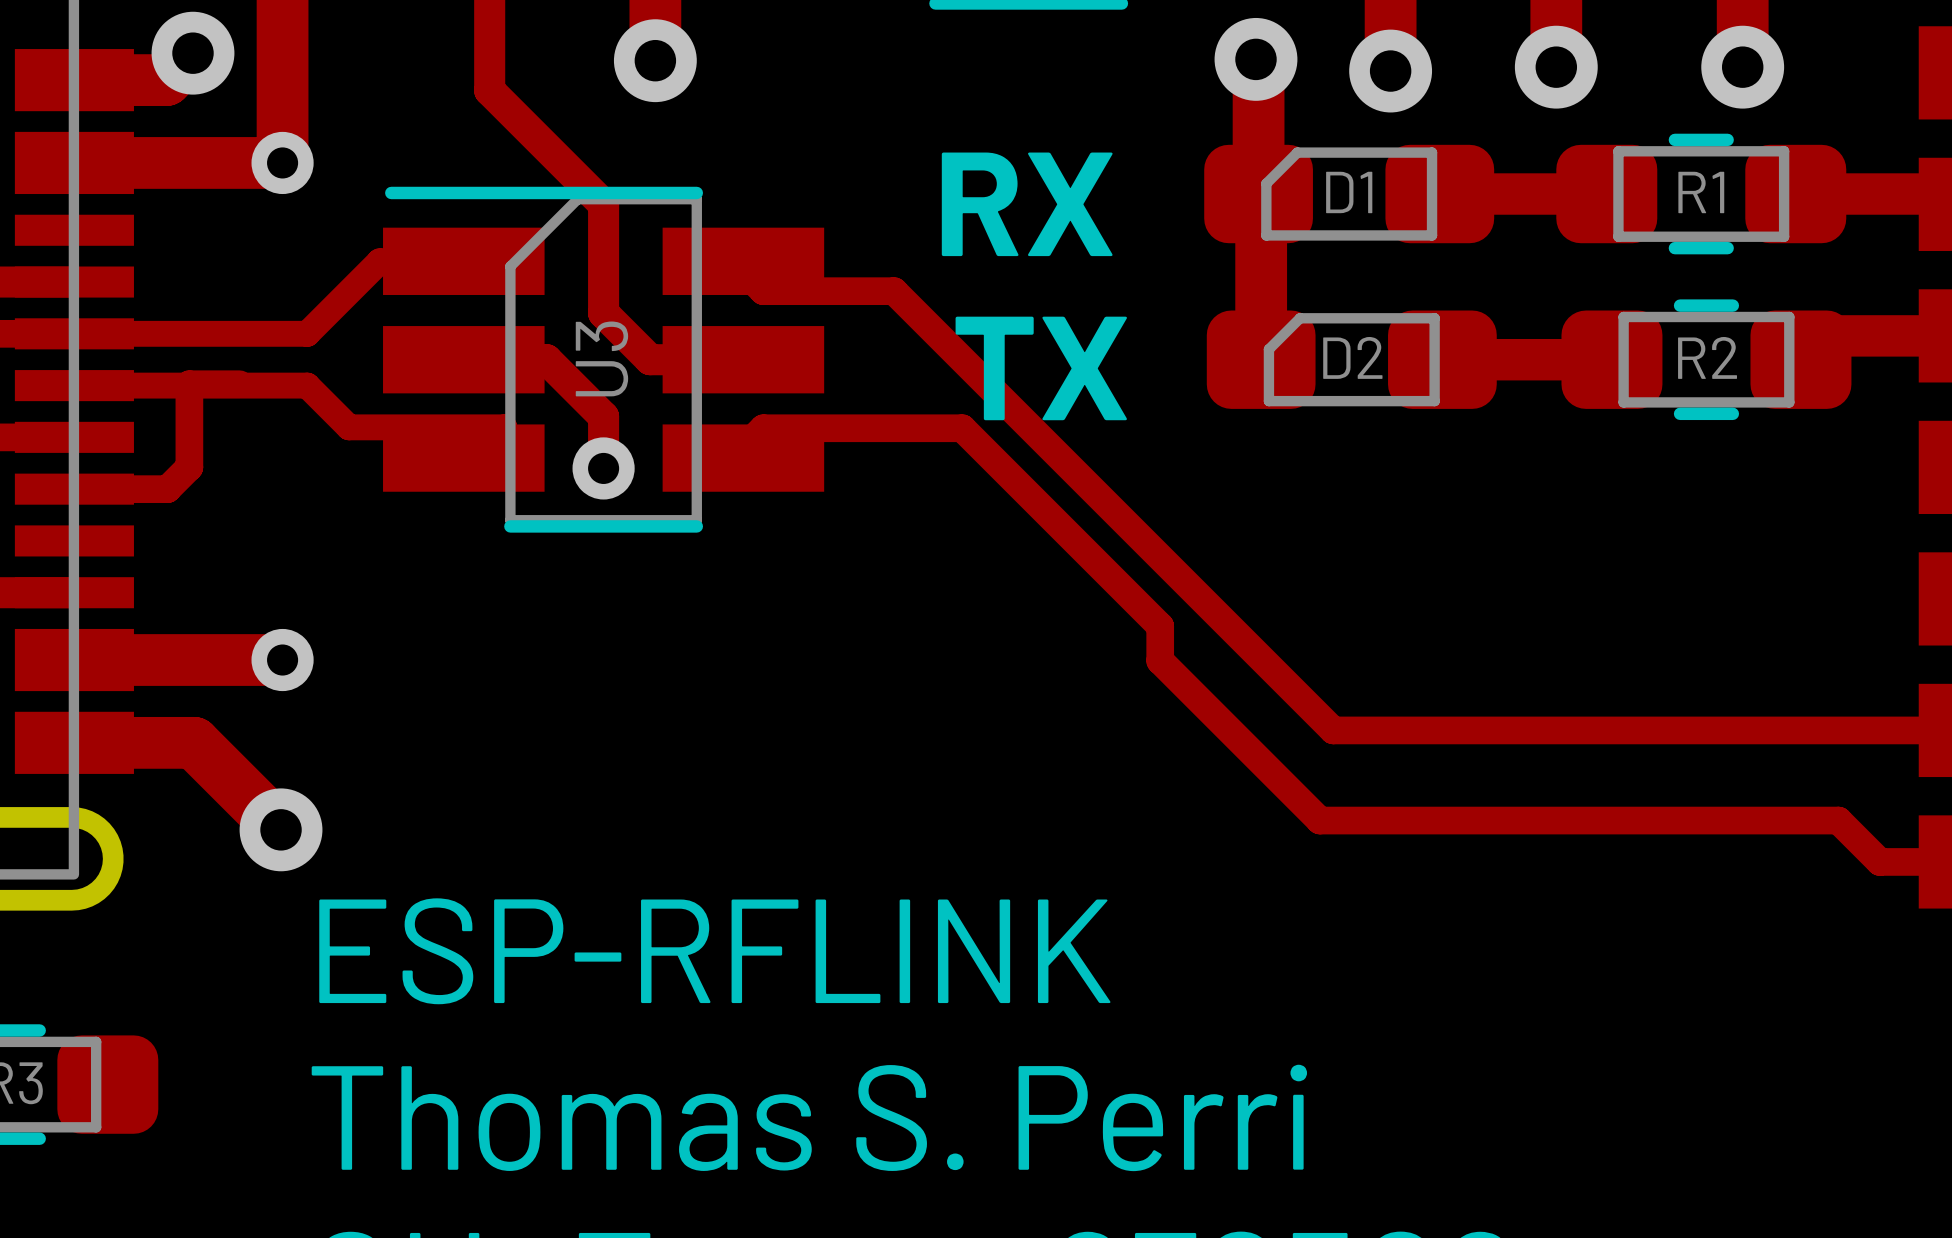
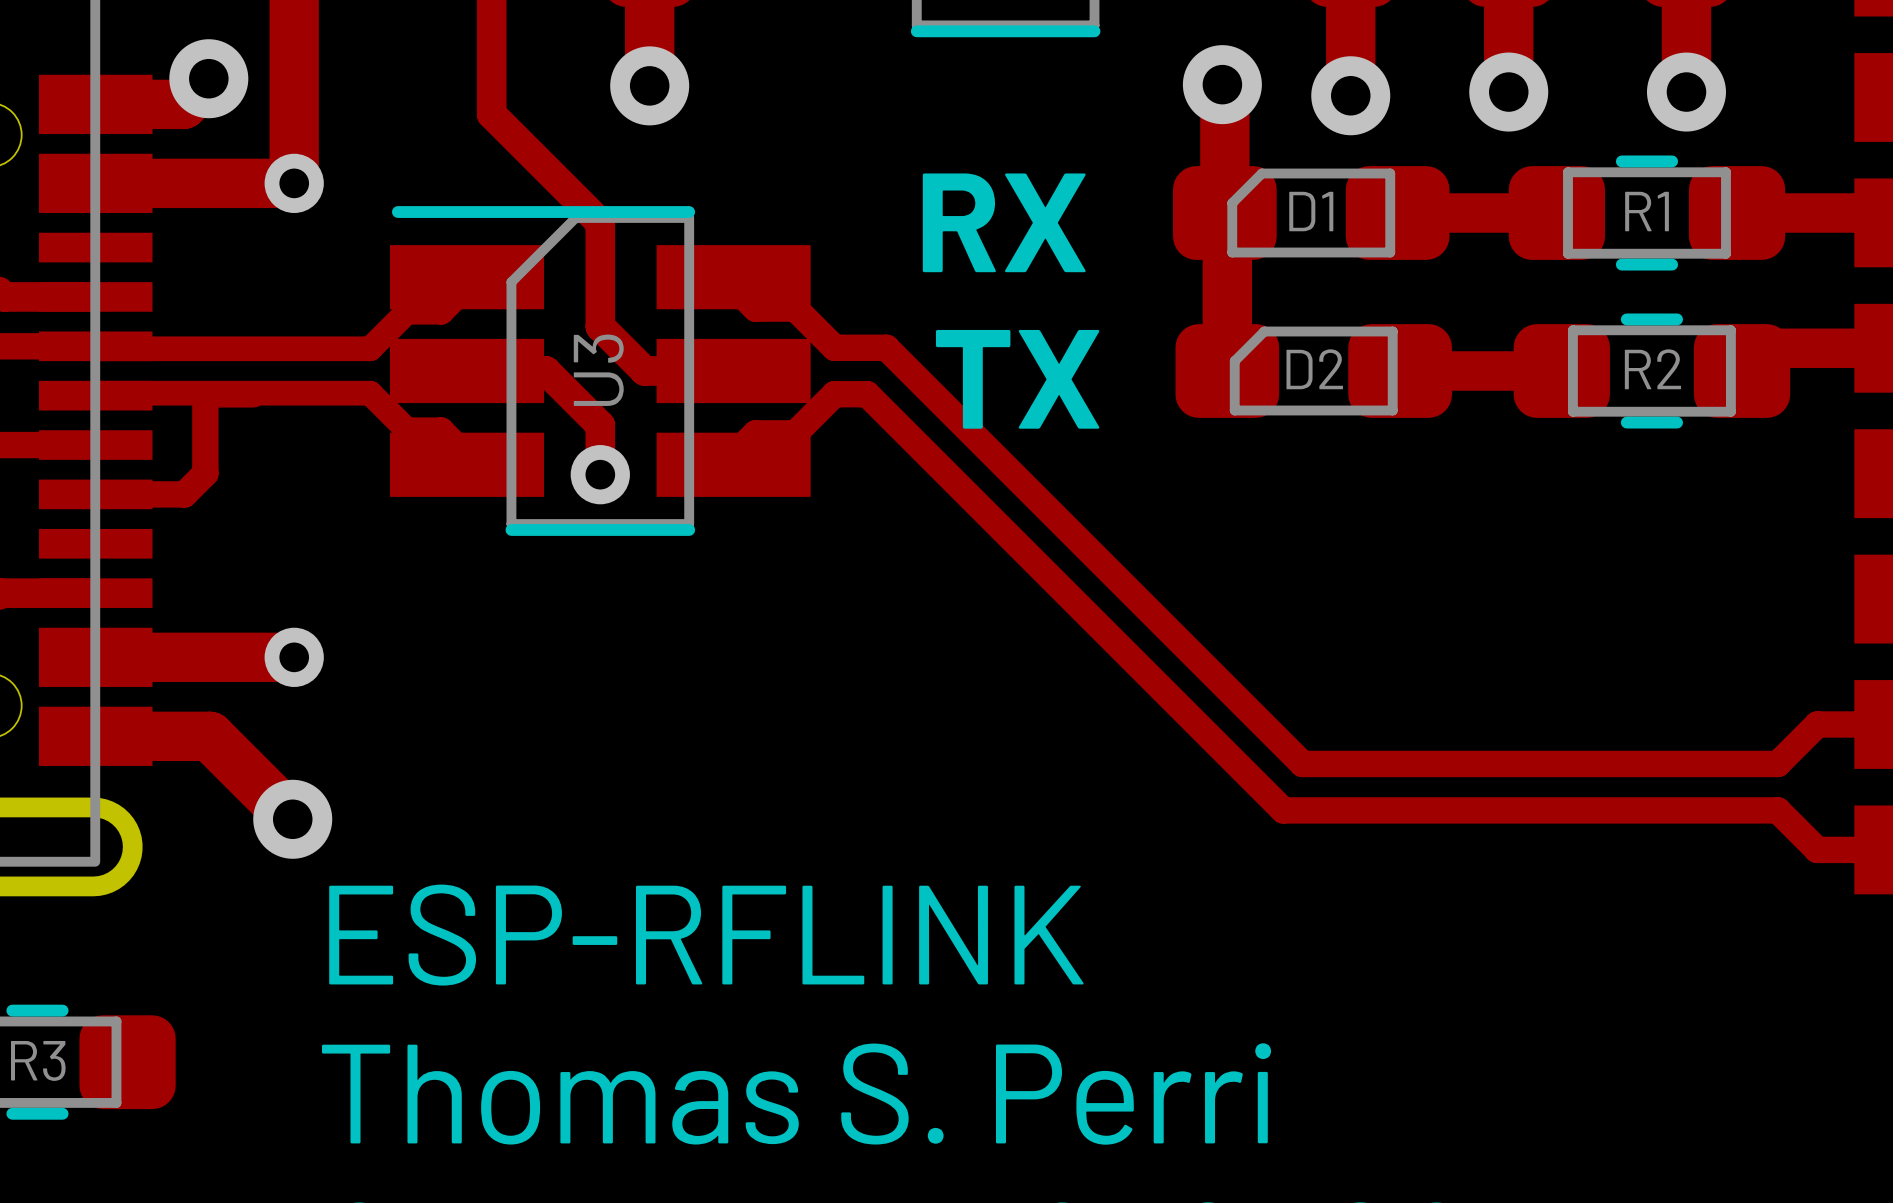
track: (473, 261) (379, 261) (307, 333) (74, 333) -> (476, 277) (441, 312) (406, 312) (370, 348) (98, 348) (95, 346)
track: (763, 291) (894, 291) (1333, 730) (1879, 730) -> (752, 305) (755, 308) (795, 308) (834, 347) (886, 347) (1302, 763) (1777, 763) (1817, 724)
track: (74, 385) (307, 385) (349, 427) (504, 427) (473, 458) -> (95, 395) (98, 393) (370, 393) (406, 429) (441, 429) (476, 464)
track: (763, 428) (962, 428) (1160, 626) (1160, 660) -> (752, 436) (755, 433) (795, 433) (834, 394) (867, 394) (1131, 658)

